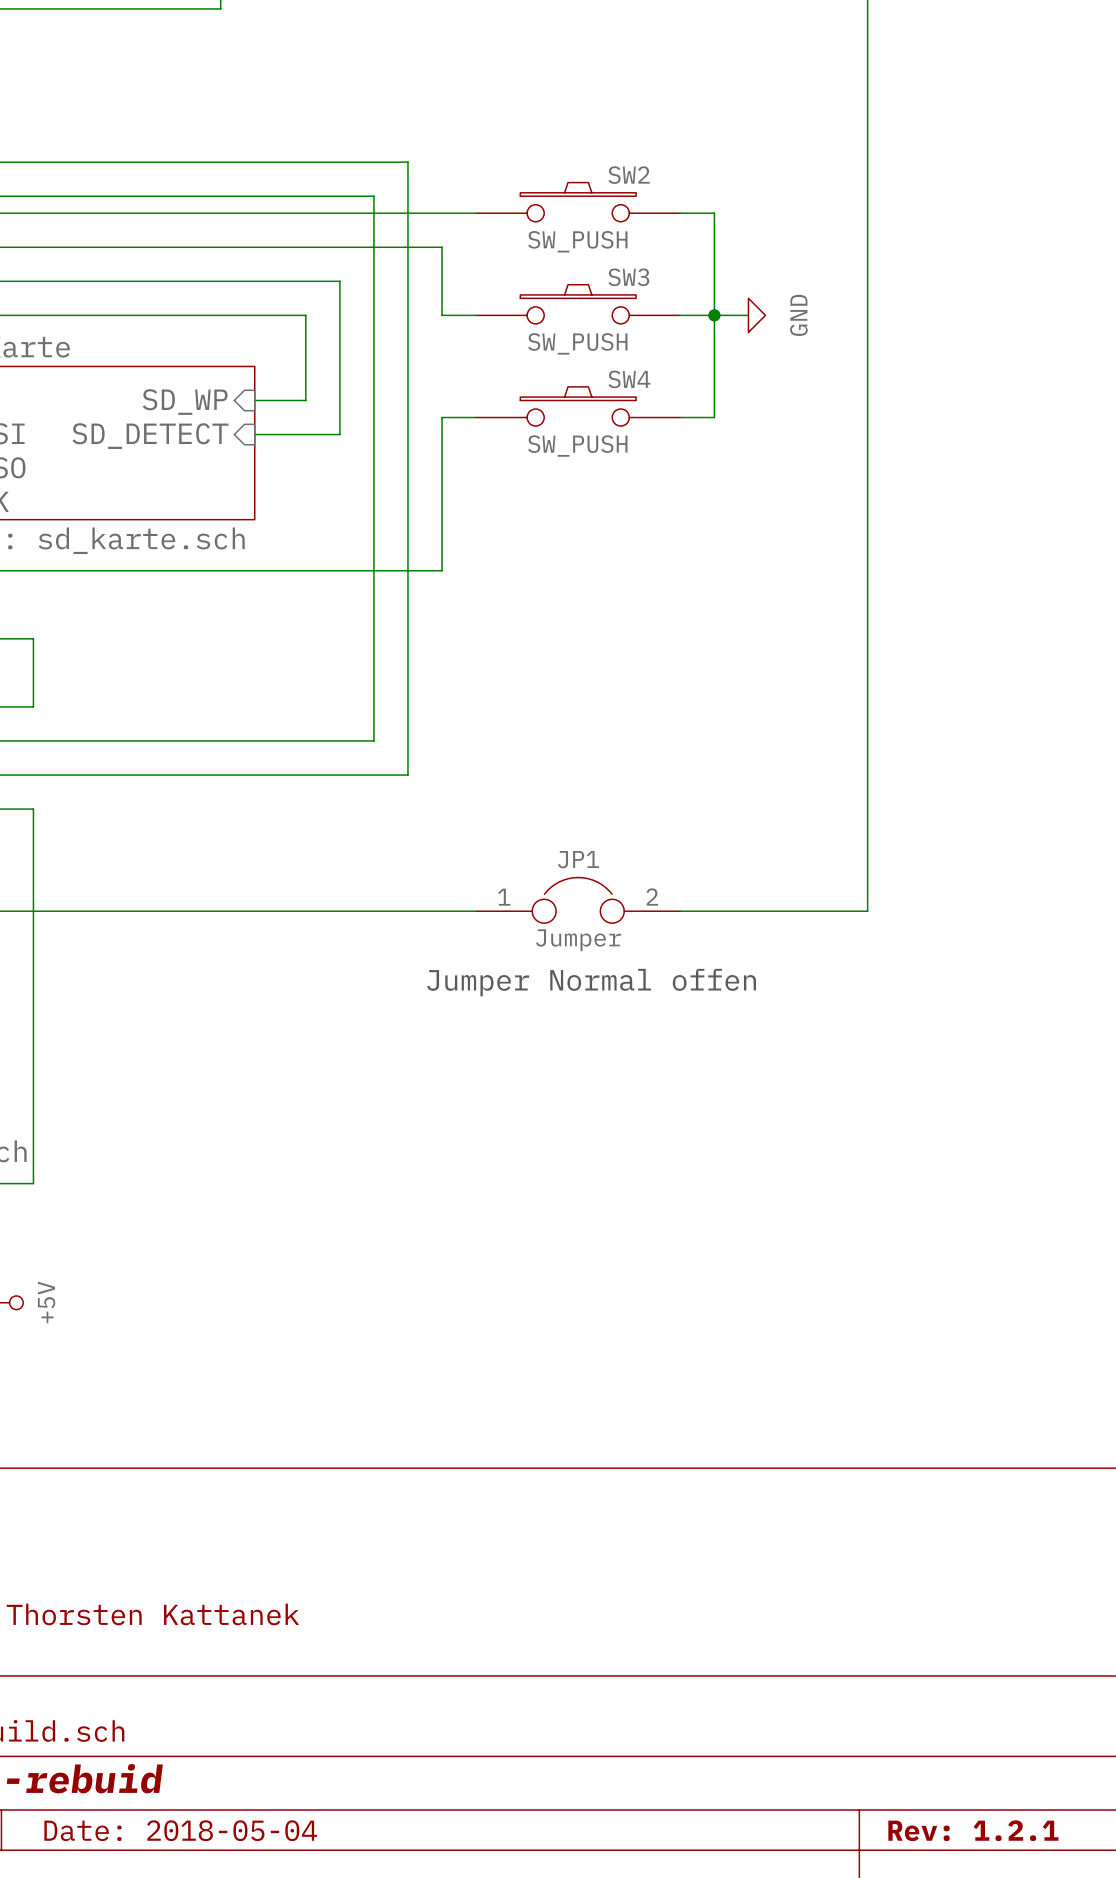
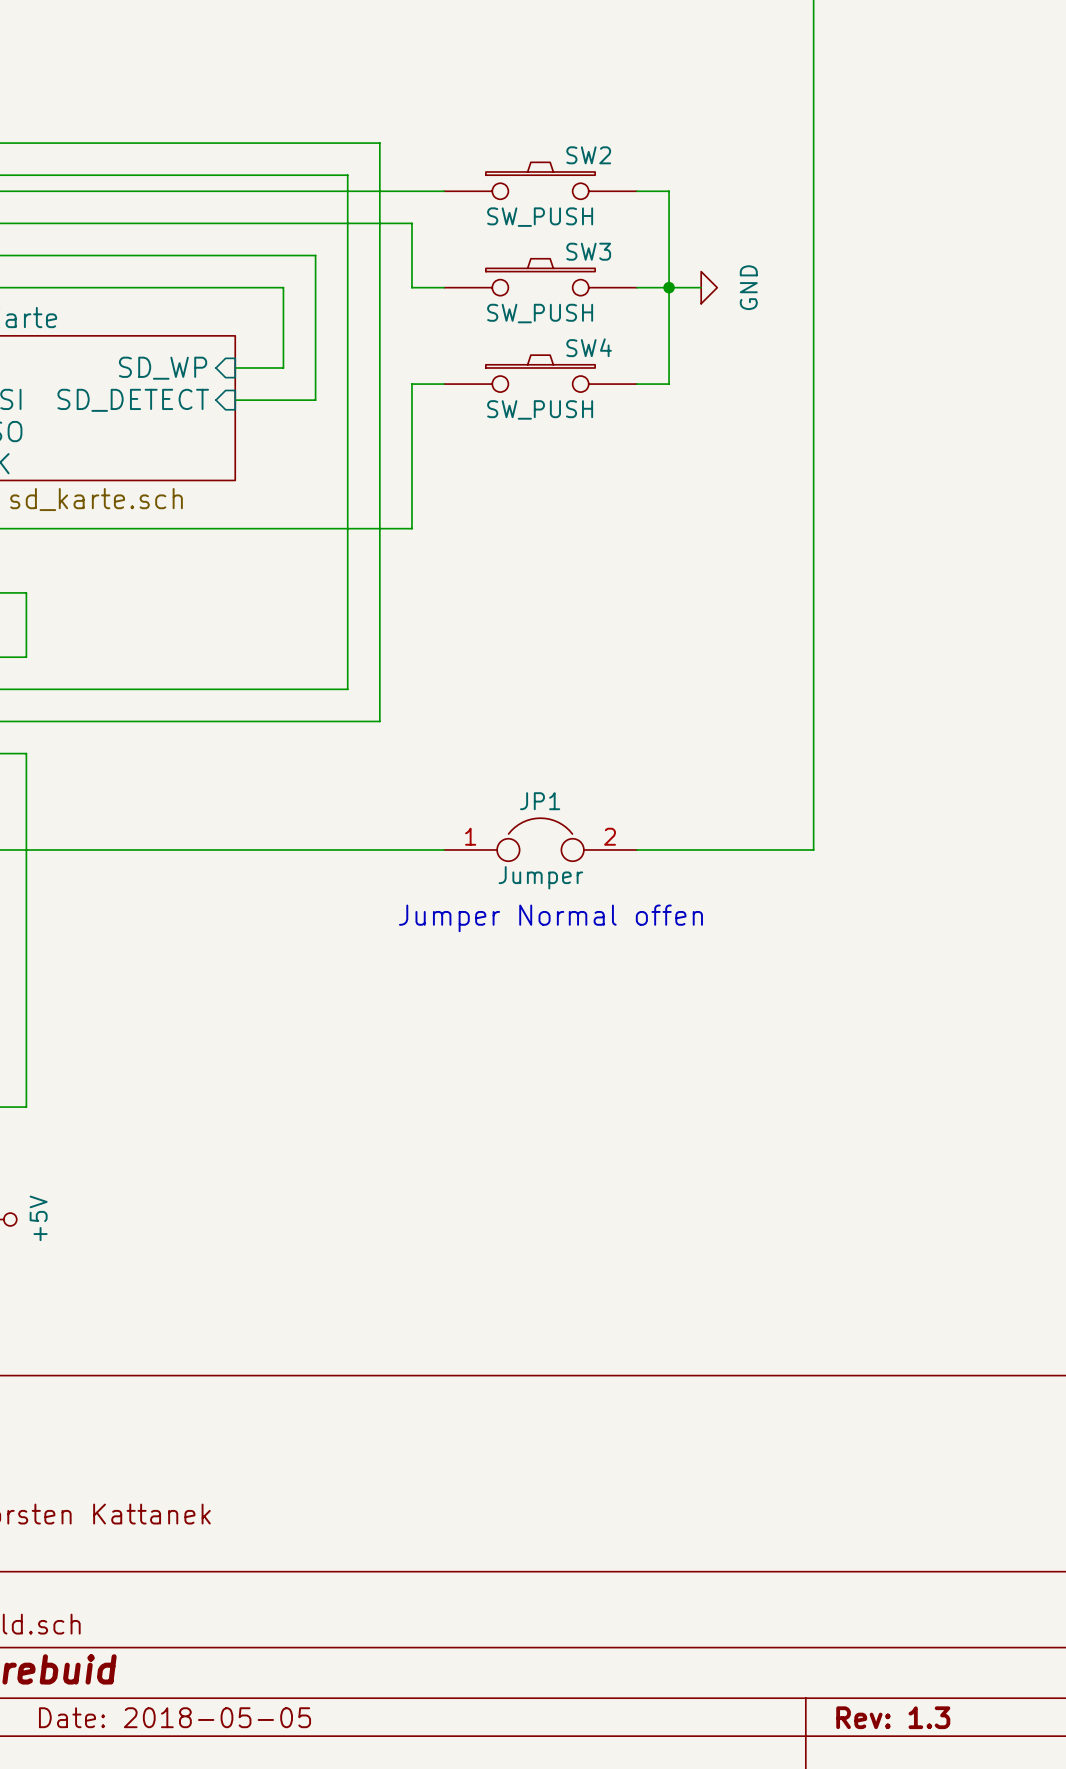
title block: Date: 2018-05-04 (180, 1830) -> Date: 2018-05-05 (175, 1717)
title block: Rev: 1.2.1 (973, 1830) -> Rev: 1.3 (893, 1717)

